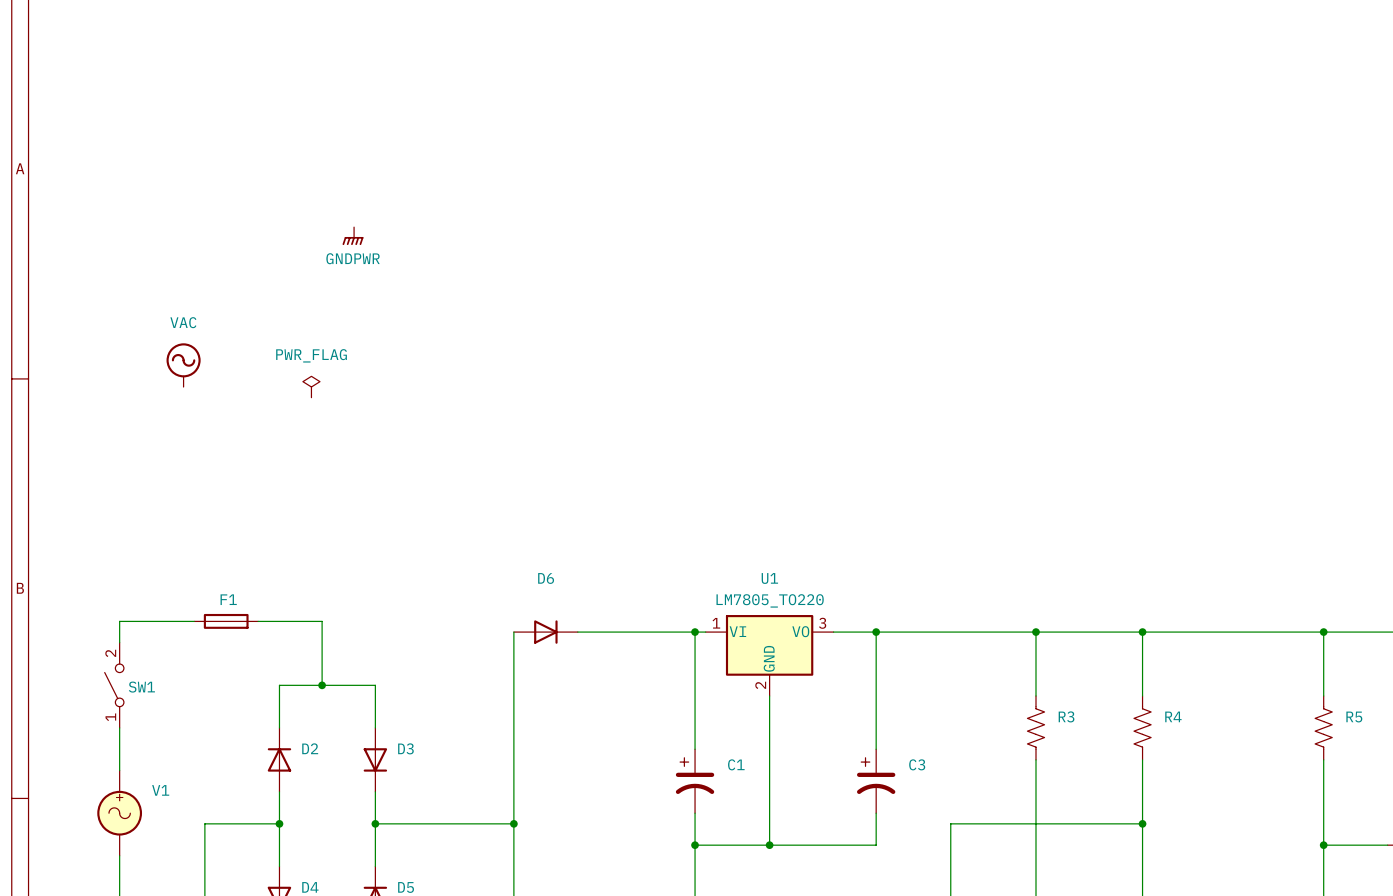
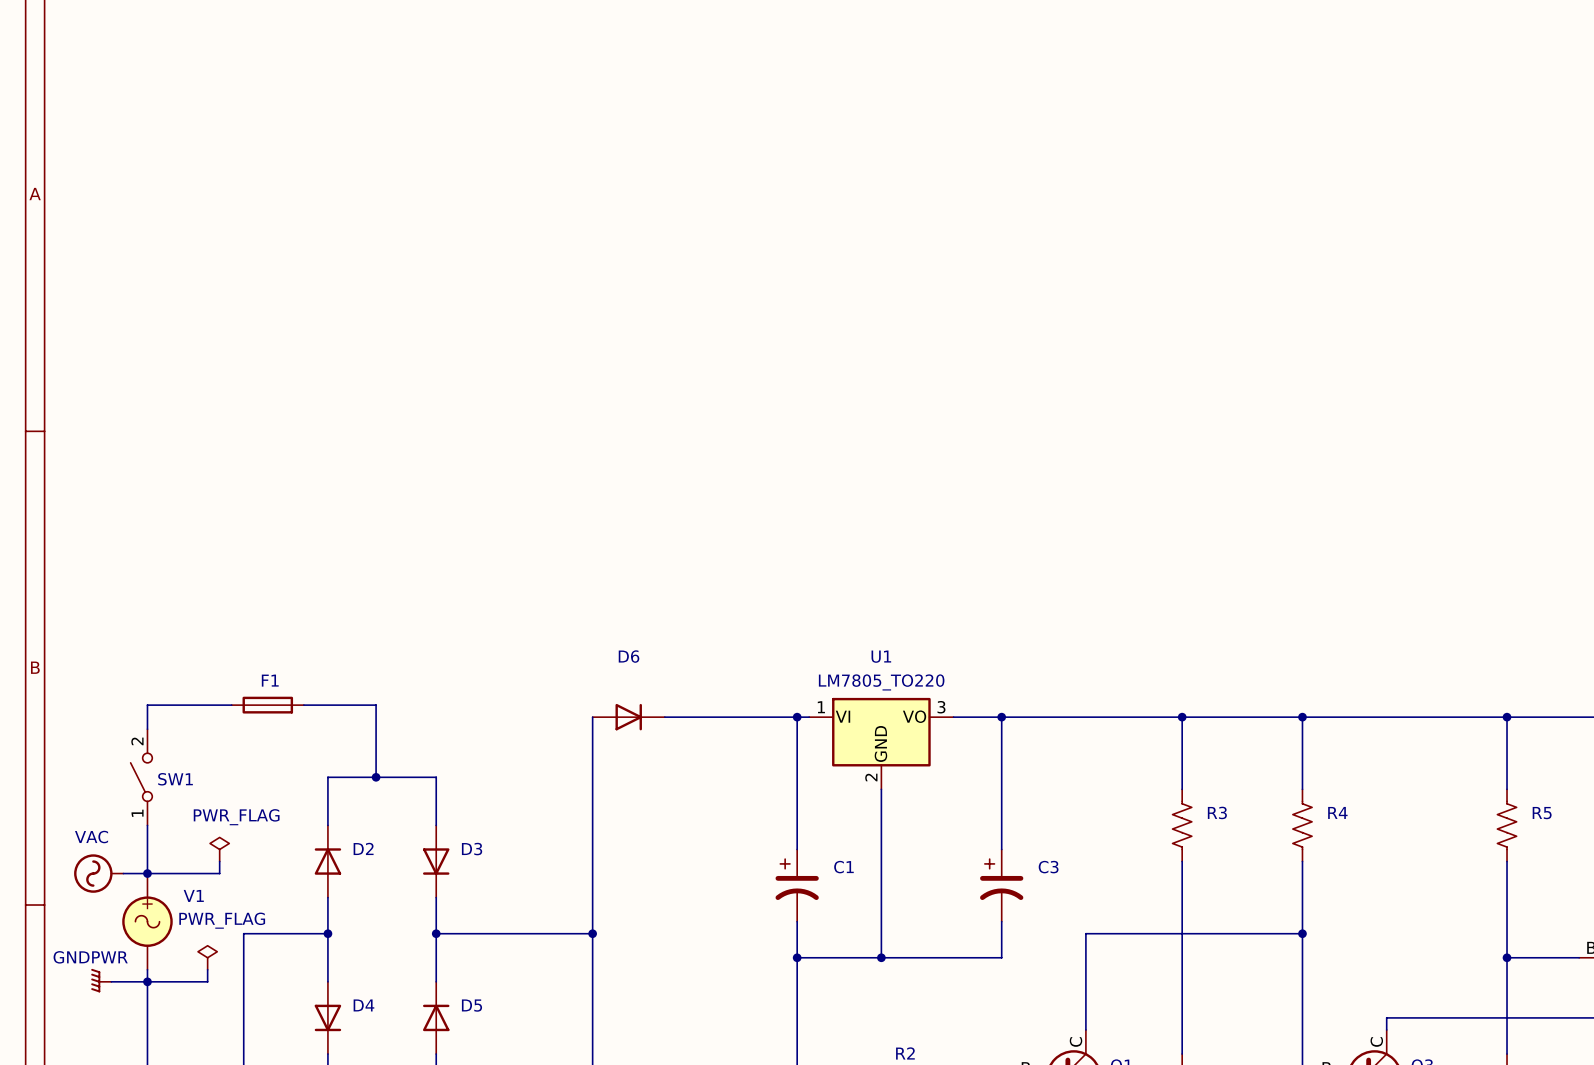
power symbol: GNDPWR (352, 236) -> none
power symbol: VAC (183, 365) -> none
power symbol: PWR_FLAG (311, 386) -> none
power symbol: none -> PWR_FLAG (219, 849)
wire: none -> (219, 861) (219, 873) (123, 873)
power symbol: none -> VAC (98, 873)
junction: none -> (147, 873)
power symbol: none -> PWR_FLAG (207, 957)
wire: none -> (207, 969) (207, 981) (111, 981)
power symbol: none -> GNDPWR (101, 980)
junction: none -> (147, 981)

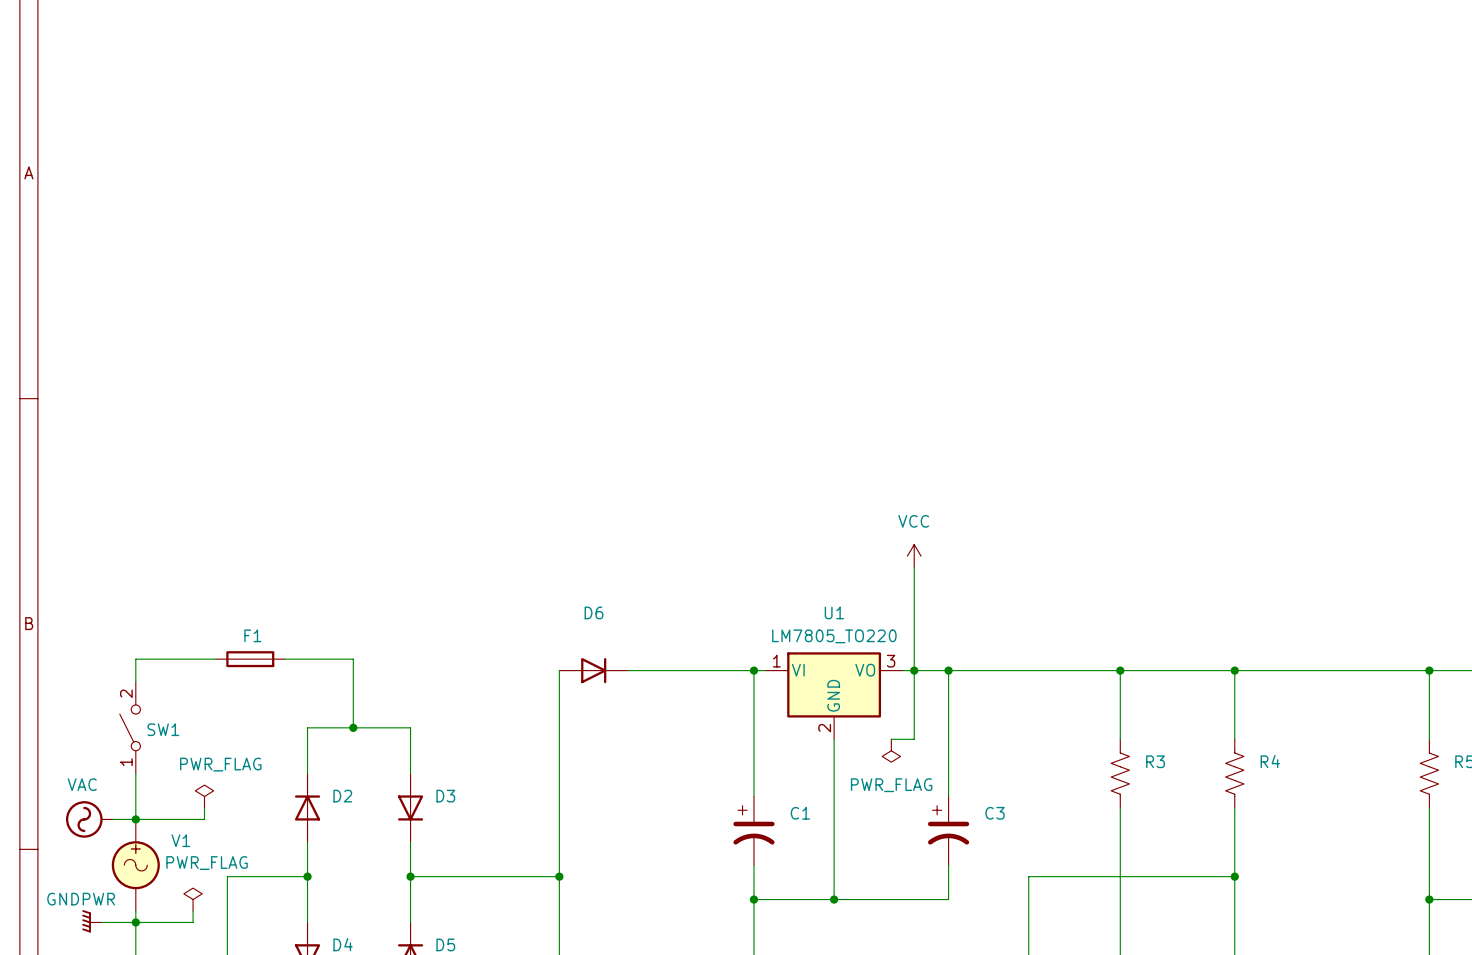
power symbol: none -> VCC (914, 556)
wire: none -> (914, 567) (914, 739) (891, 739)
junction: none -> (914, 670)
power symbol: none -> PWR_FLAG (891, 750)

